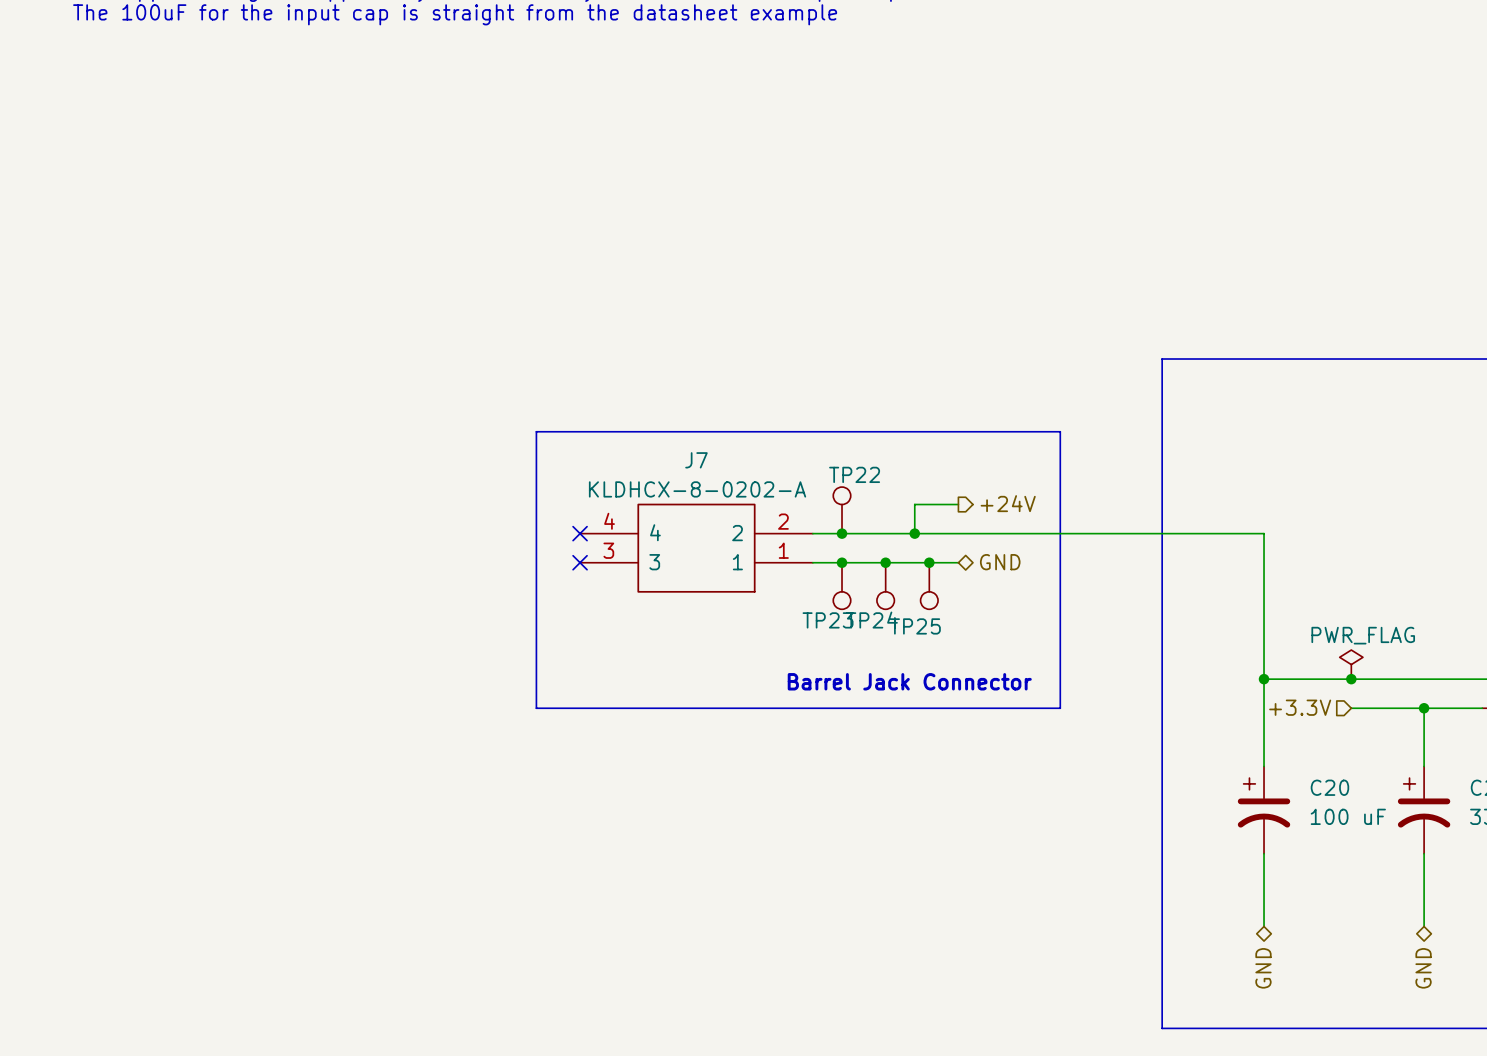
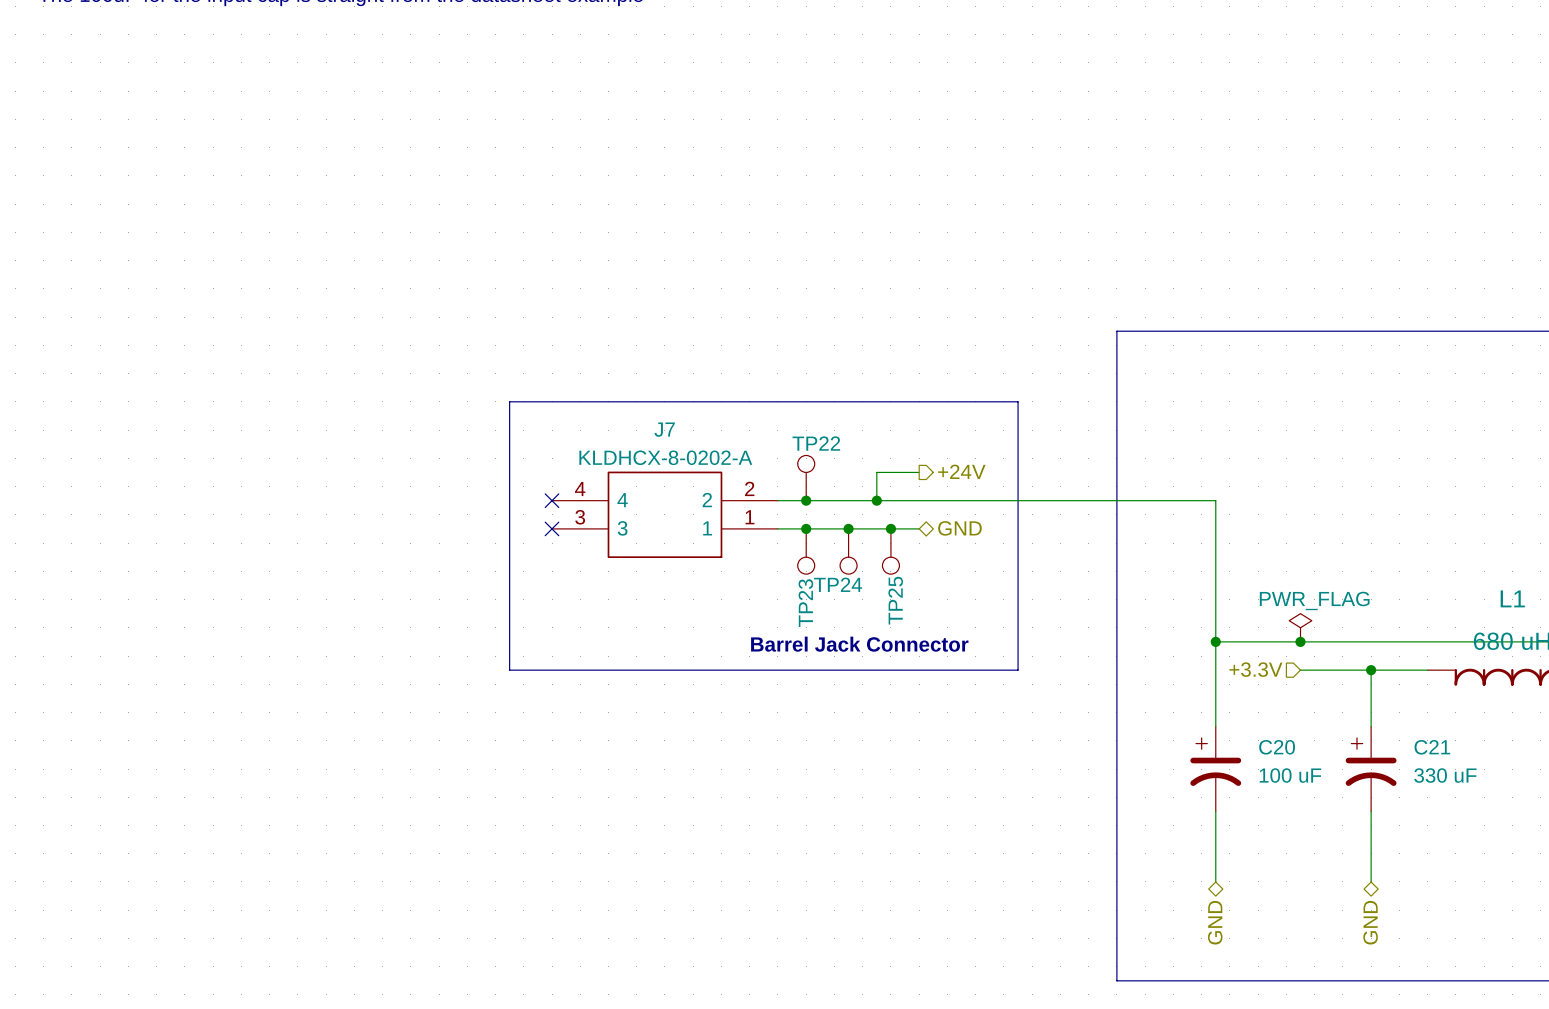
TP23 name rotation: 0° (828, 620) -> 90° counterclockwise (805, 603)
TP25 name rotation: 0° (915, 626) -> 90° counterclockwise (895, 600)

